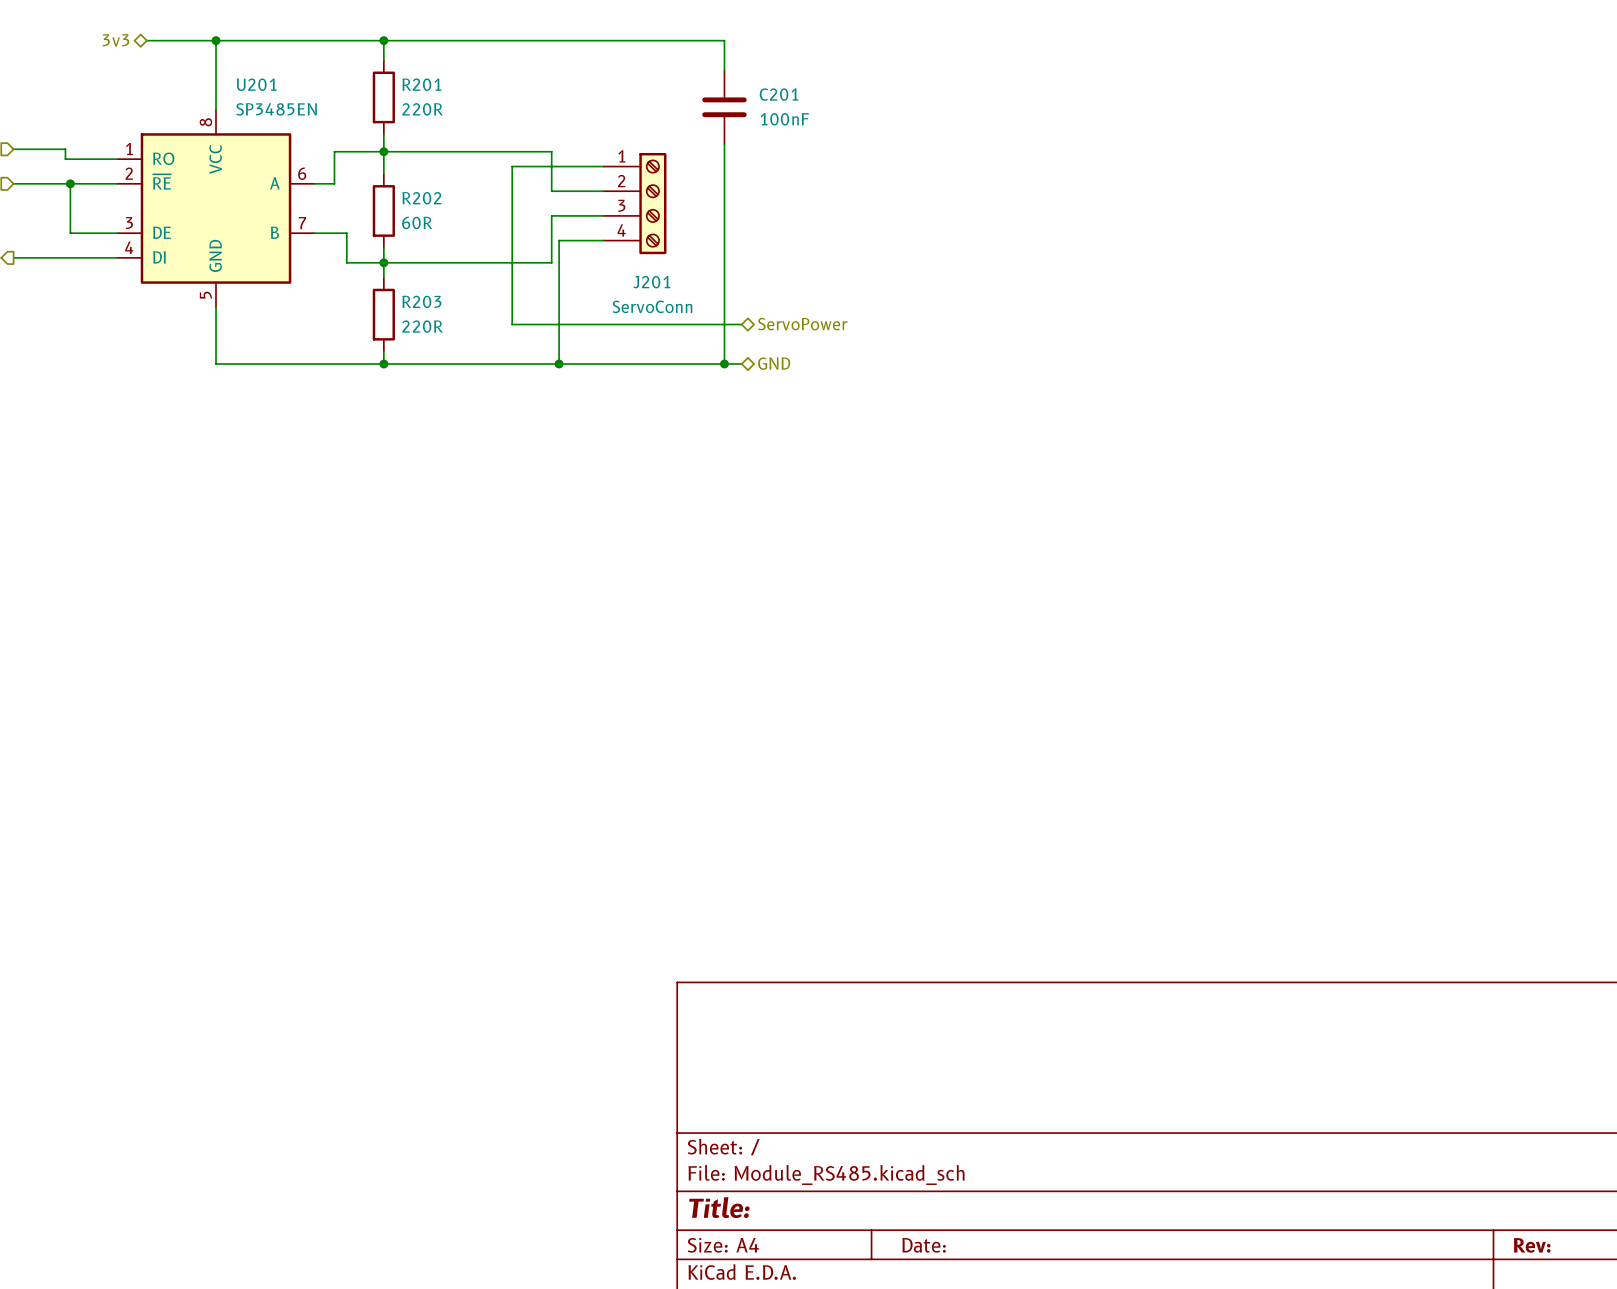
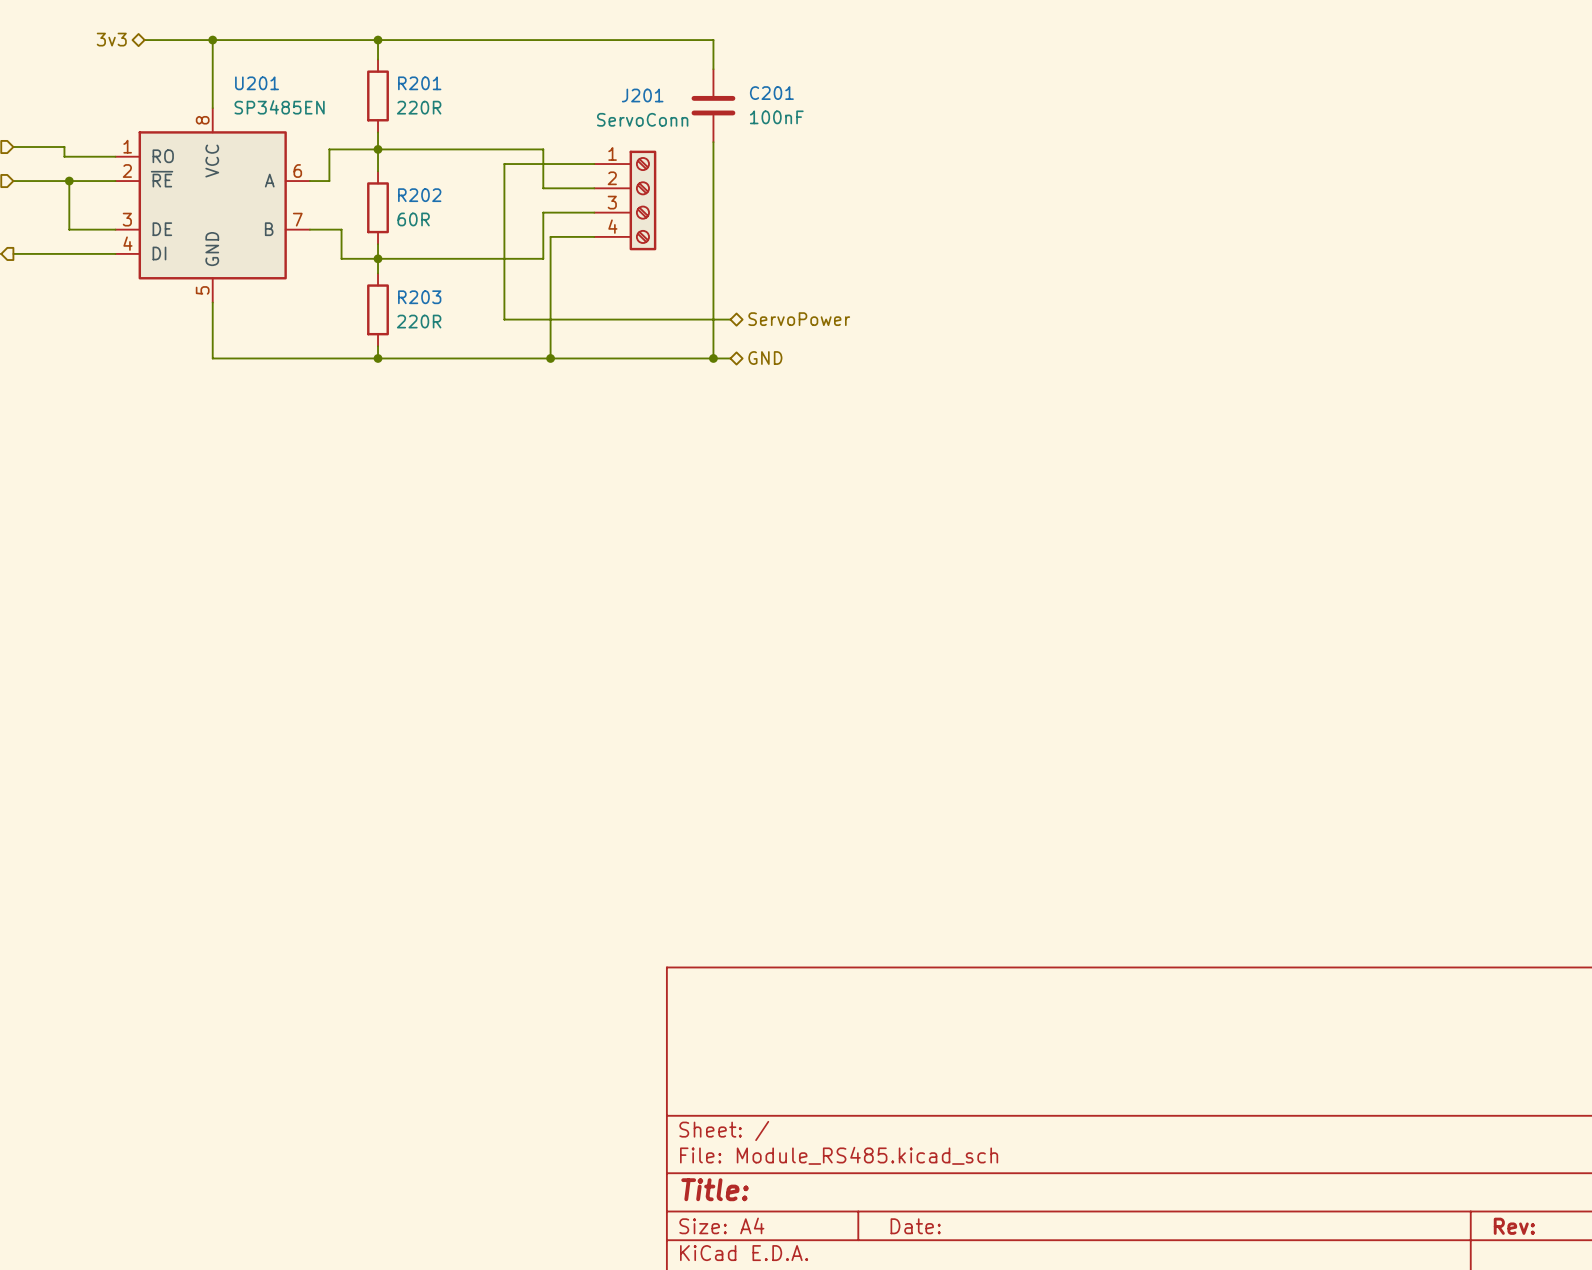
J201 name position: J201 (651, 282) -> J201 (642, 95)
J201 value position: ServoConn (652, 306) -> ServoConn (642, 119)

